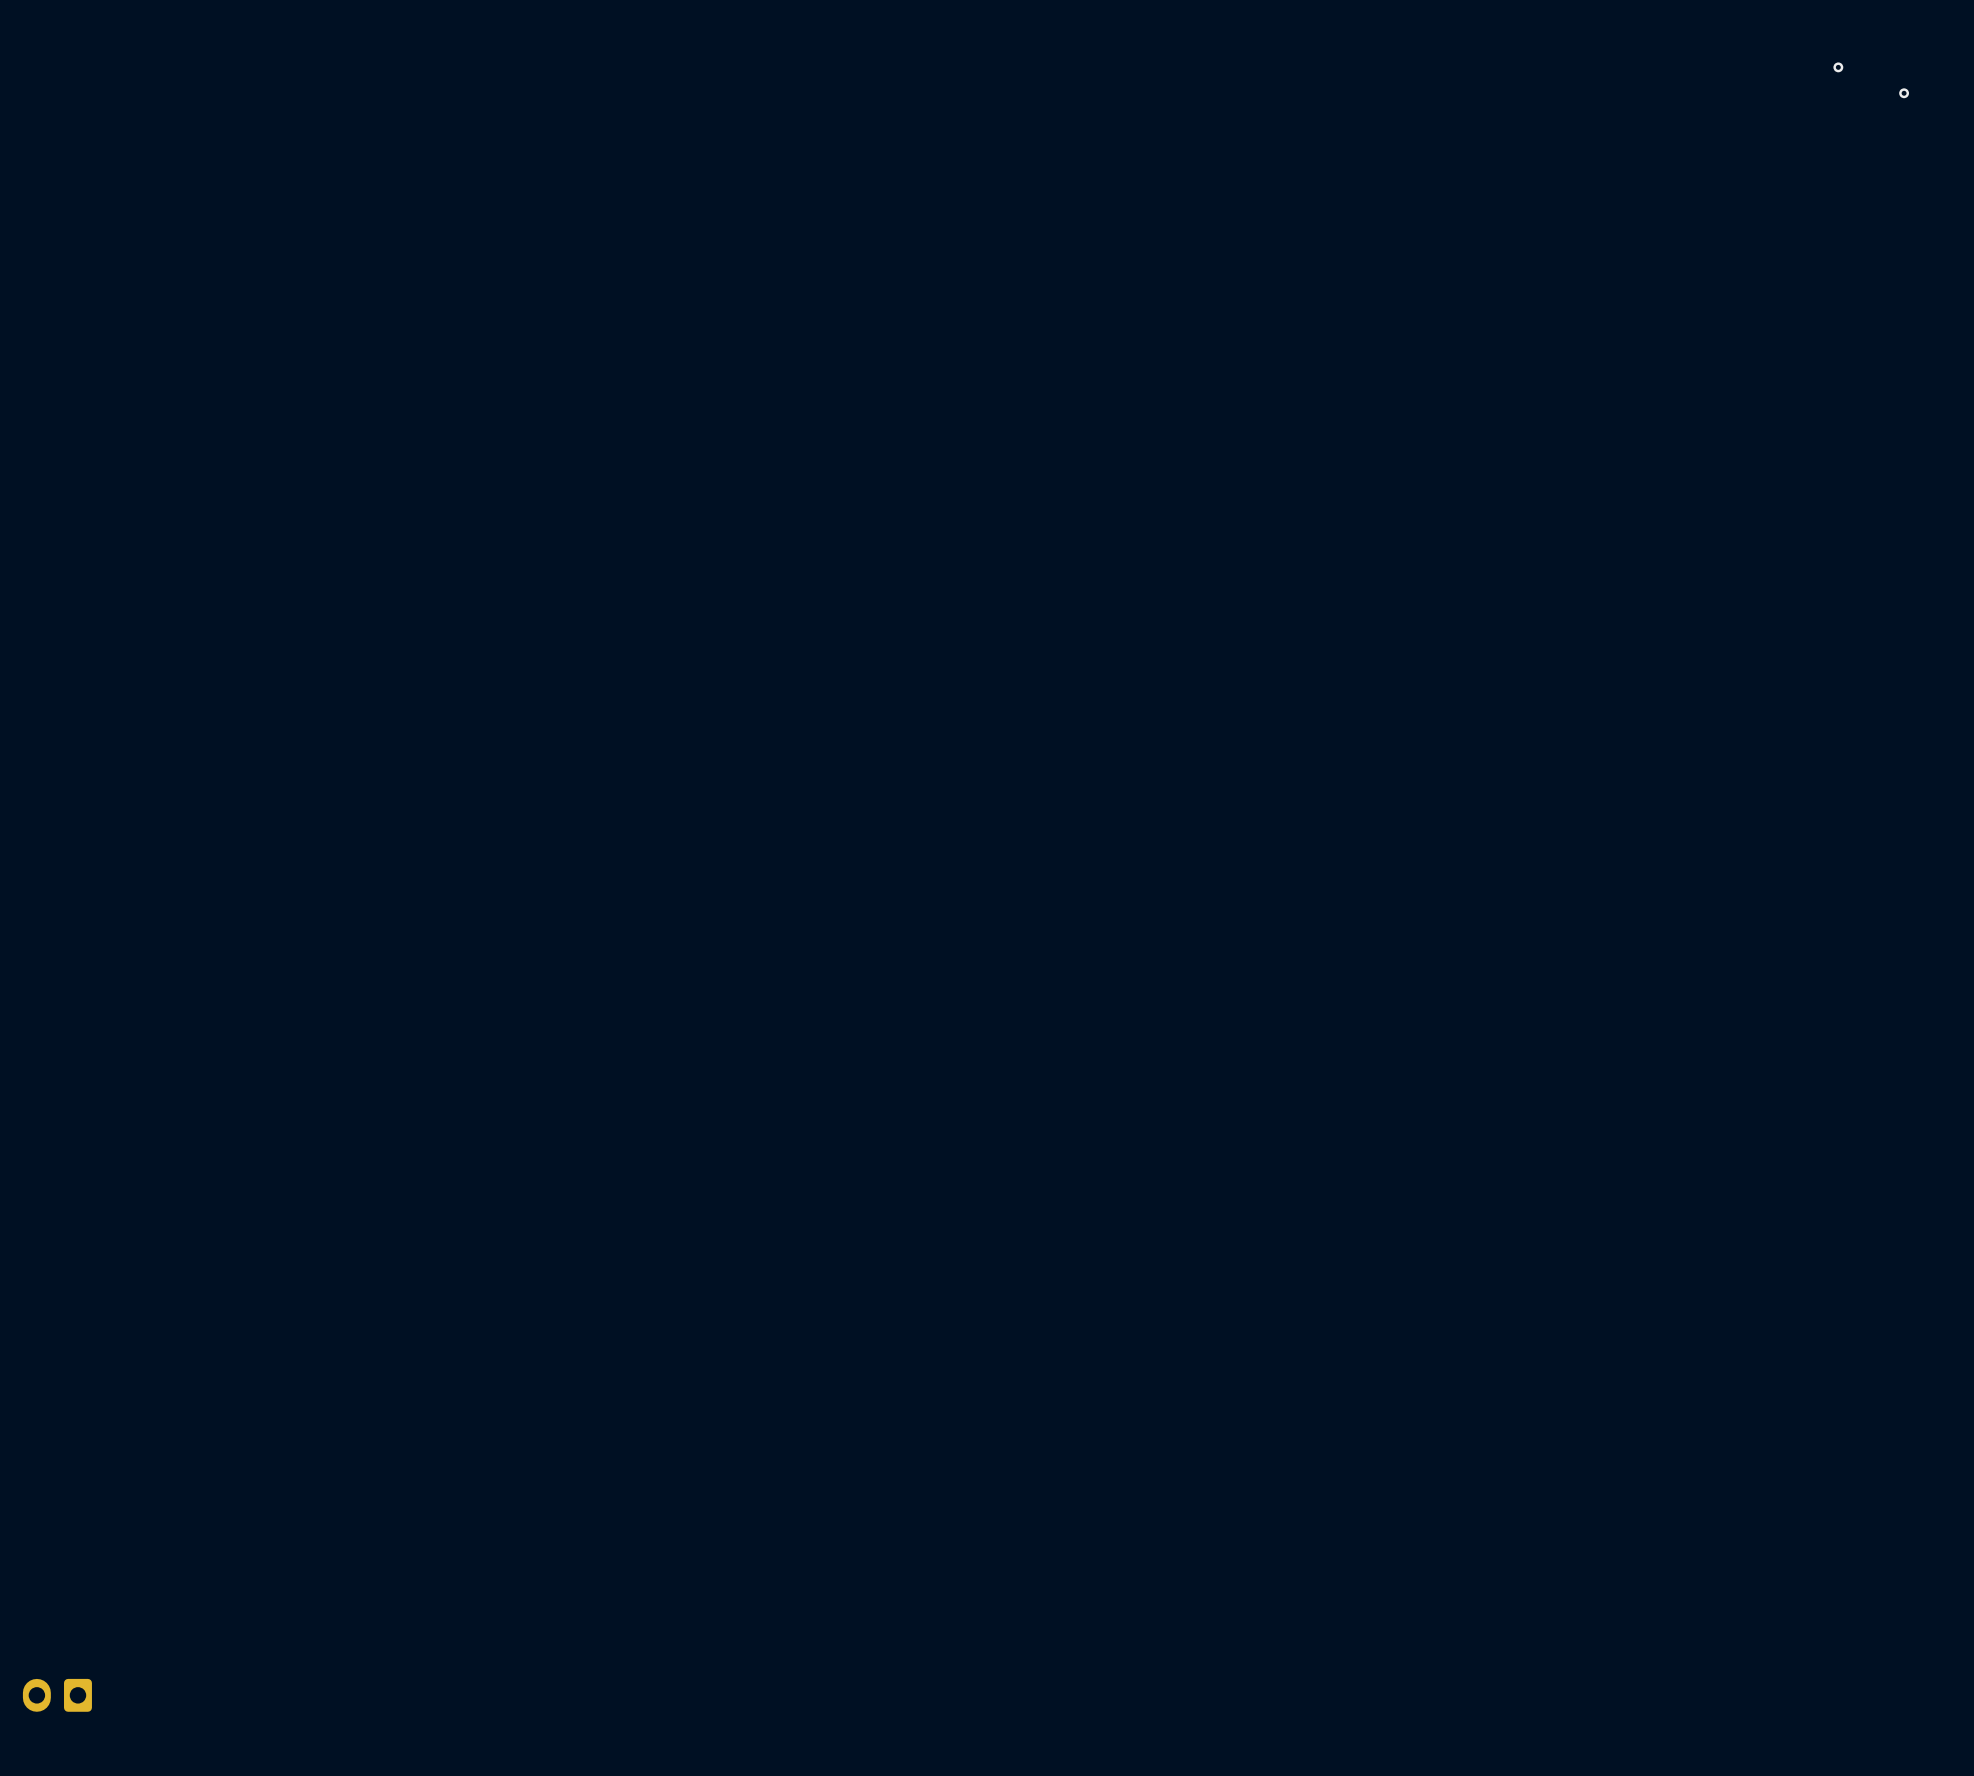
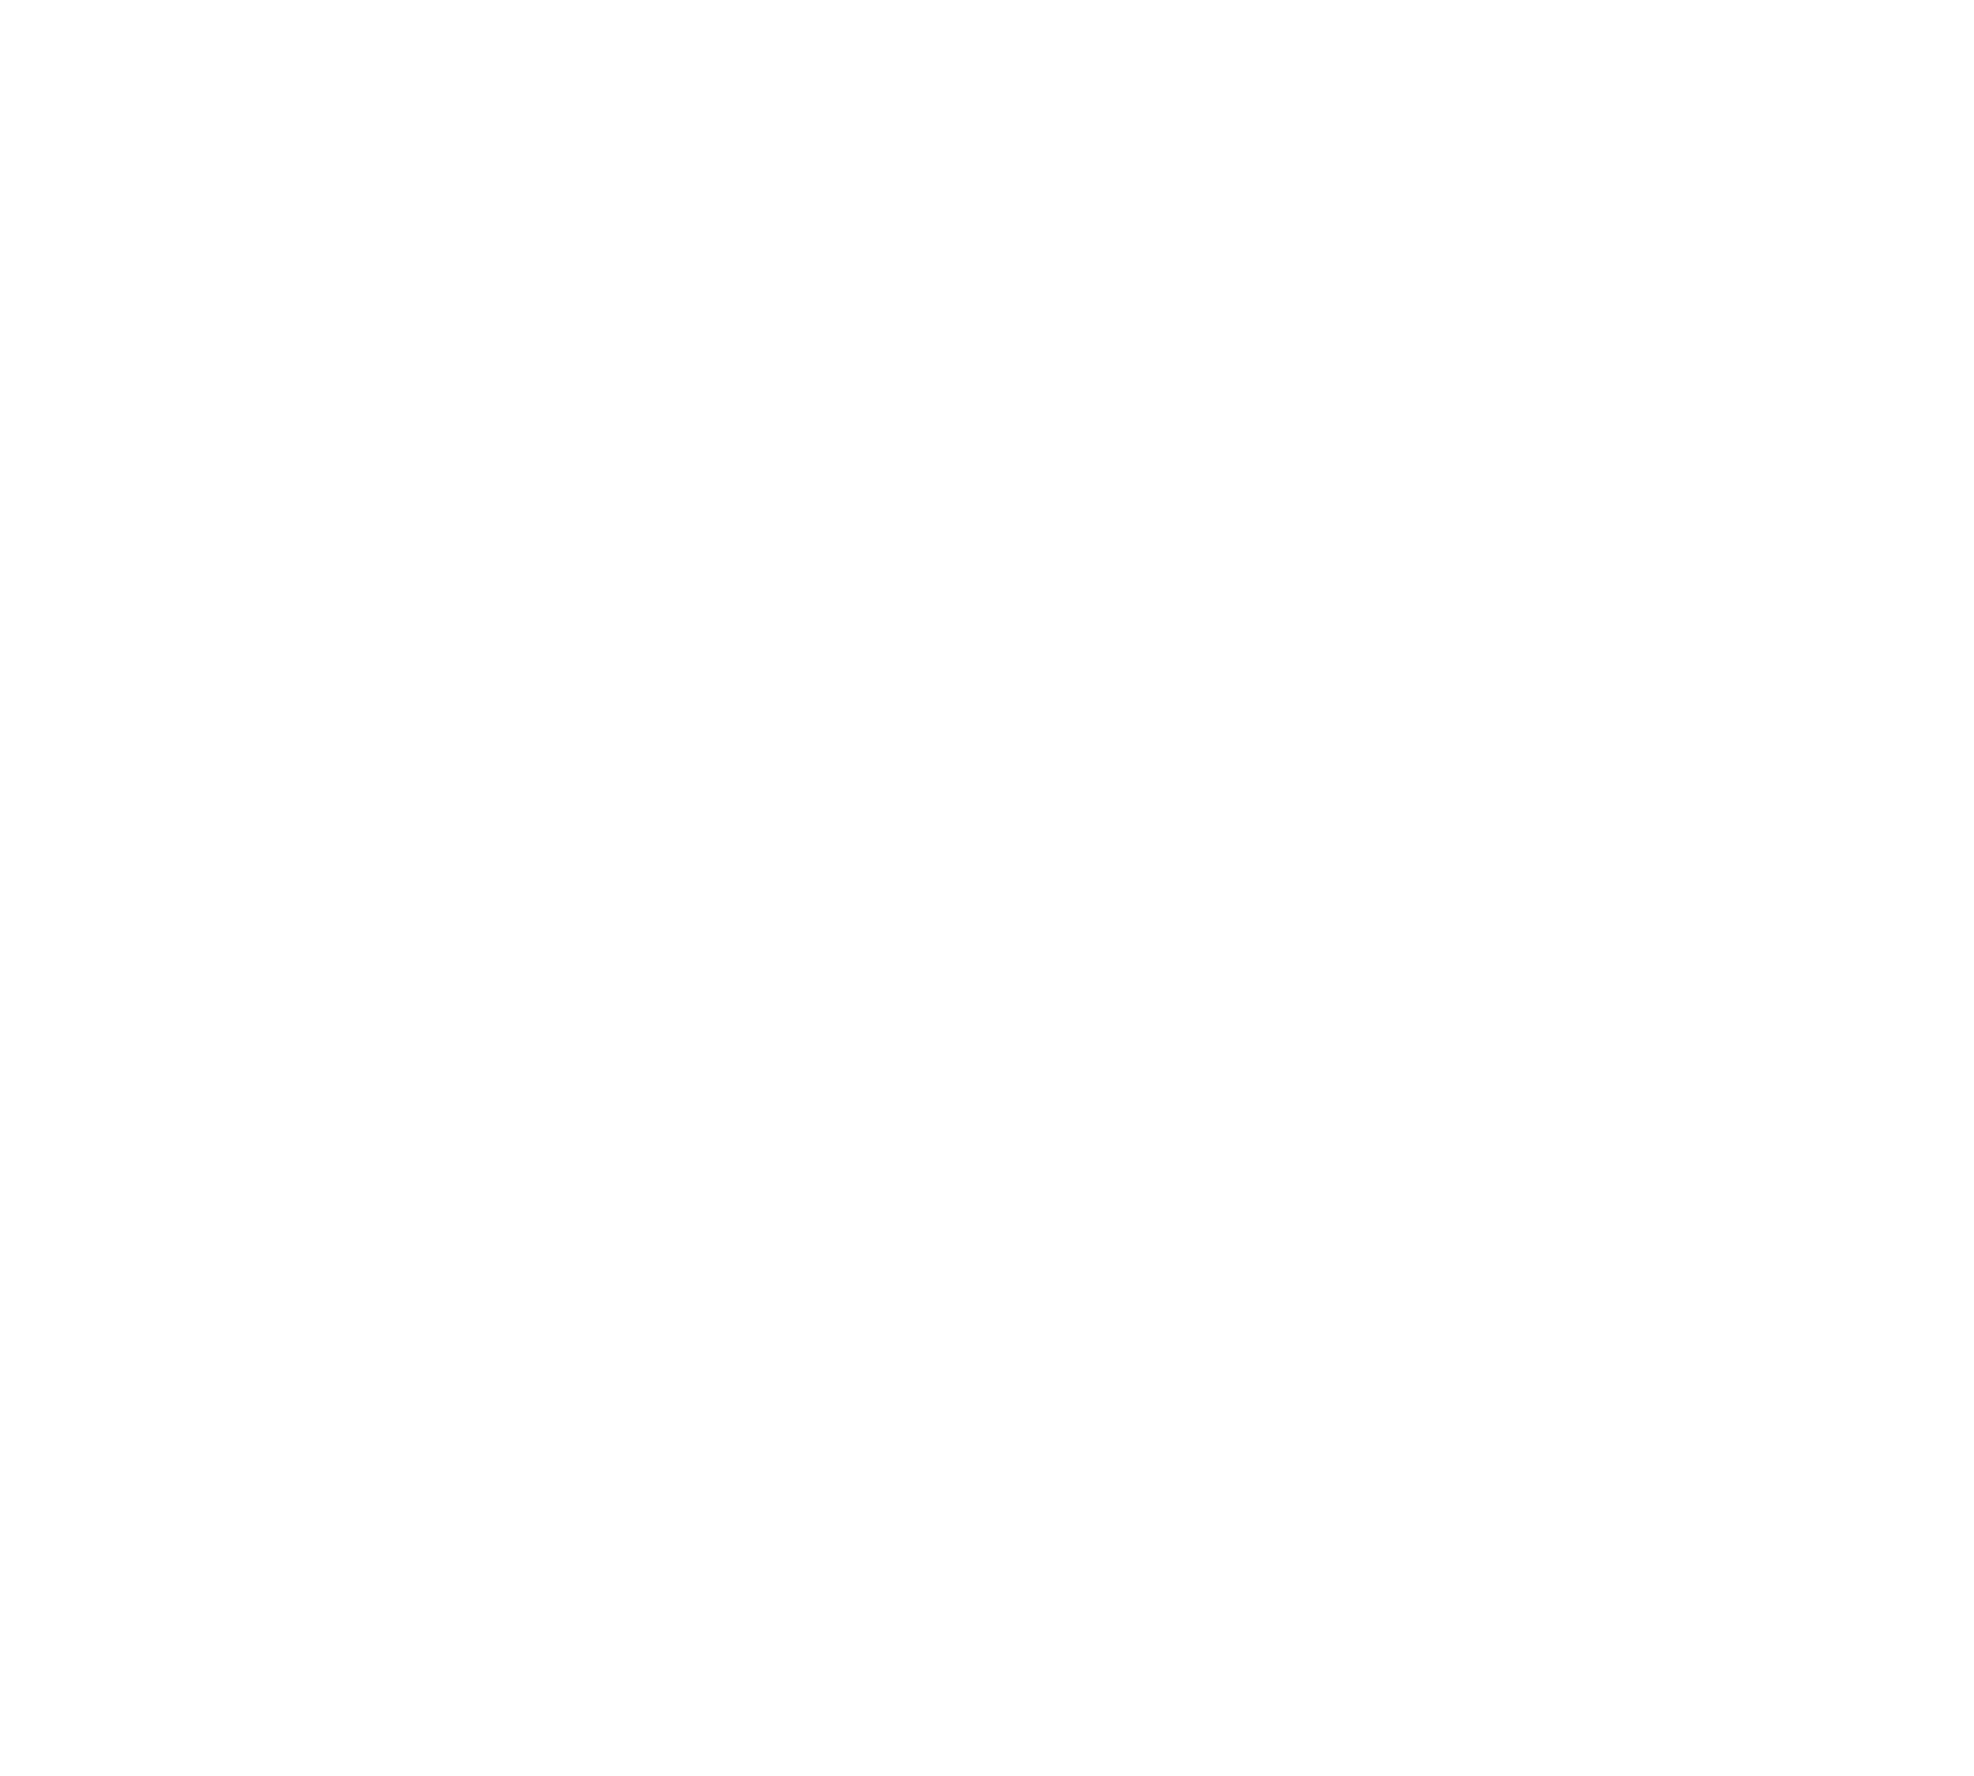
via: (1838, 67) -> none
via: (1904, 93) -> none
part: (57, 1695) -> none

